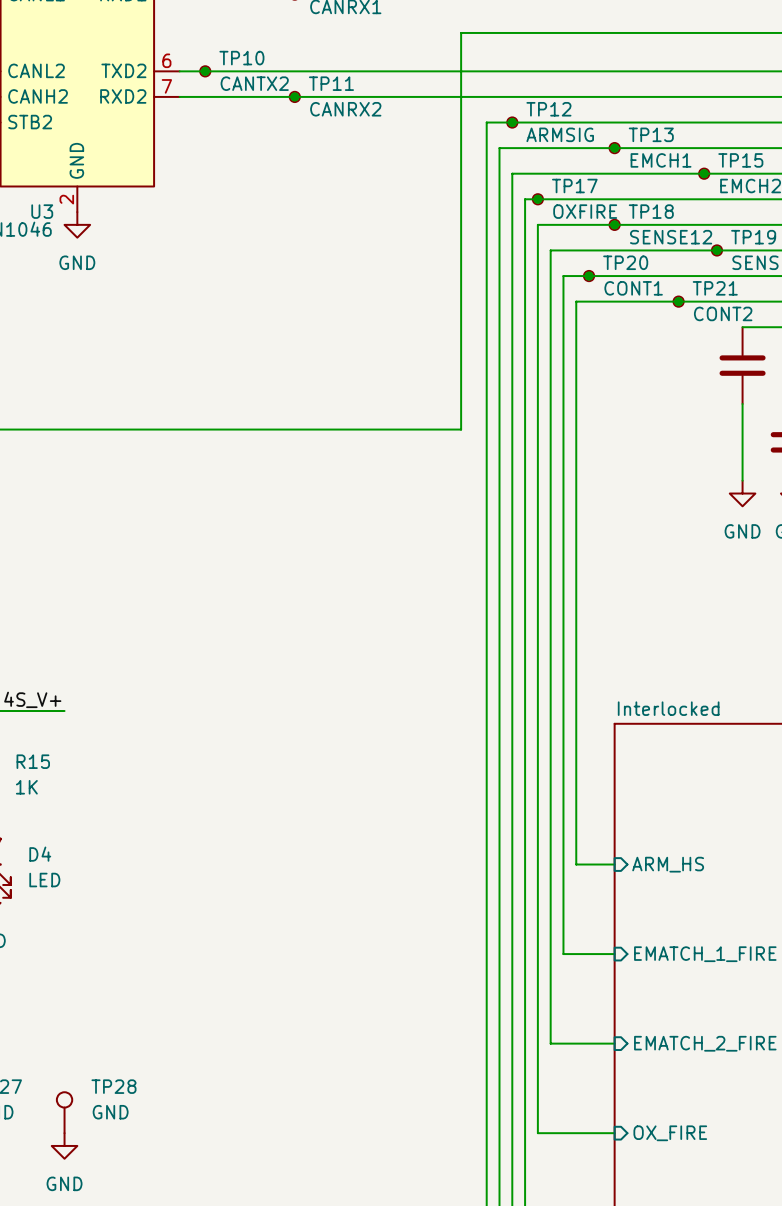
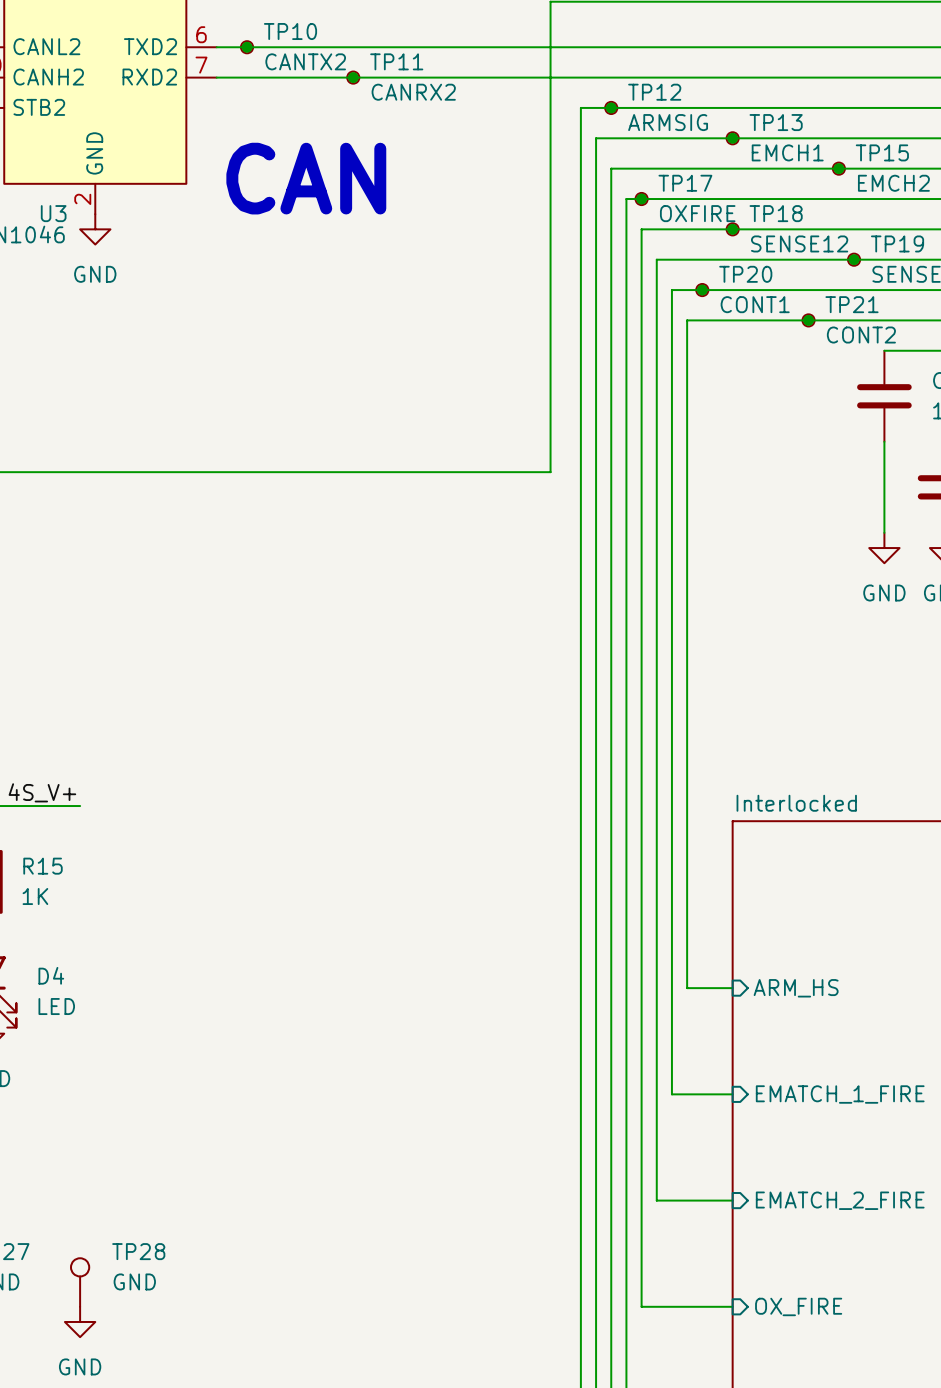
text: none -> CAN (306, 178)

